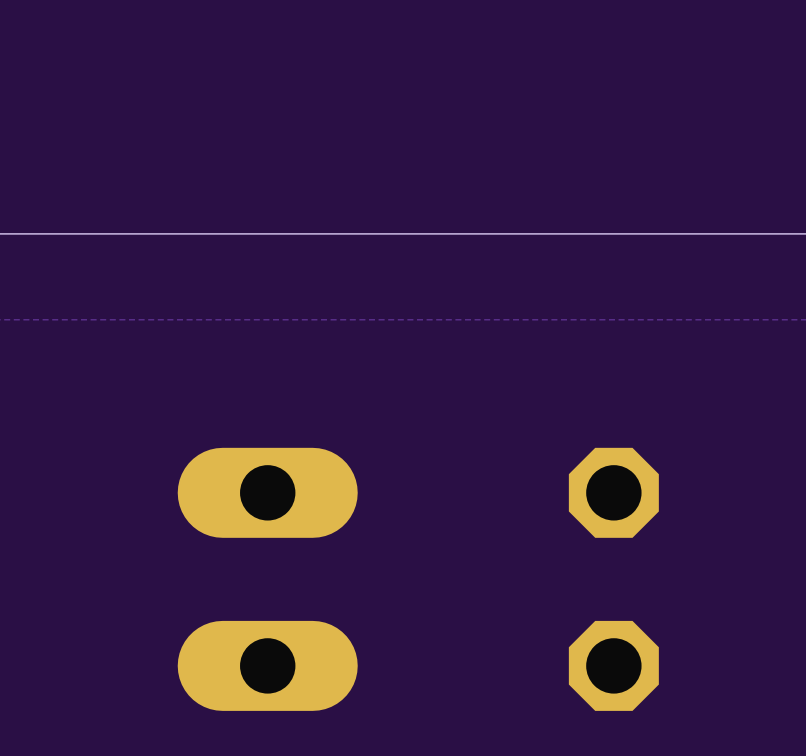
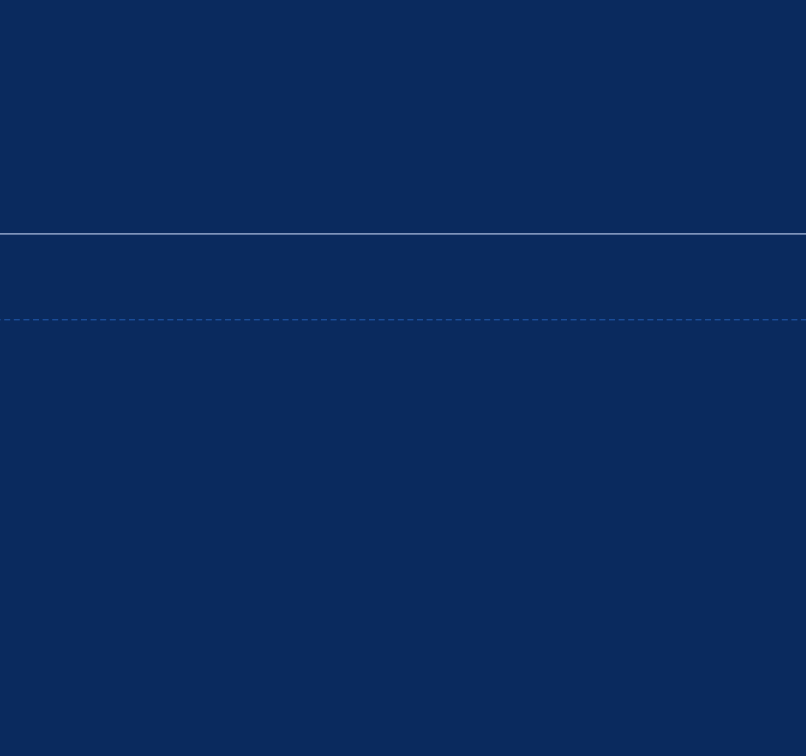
part: (267, 579) -> none
part: (613, 579) -> none

